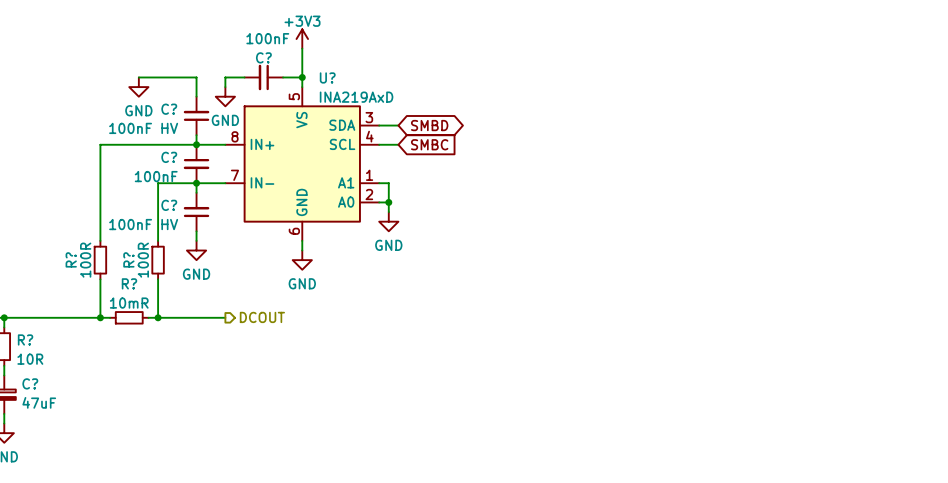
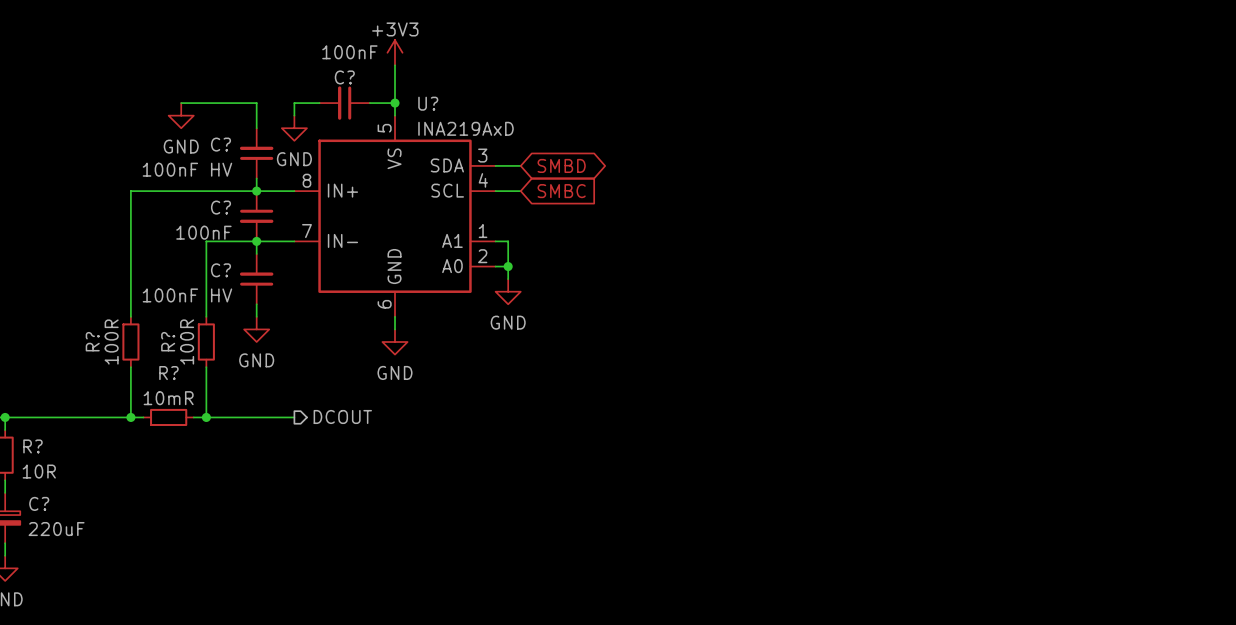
C? value: 47uF (39, 402) -> 220uF (56, 529)

